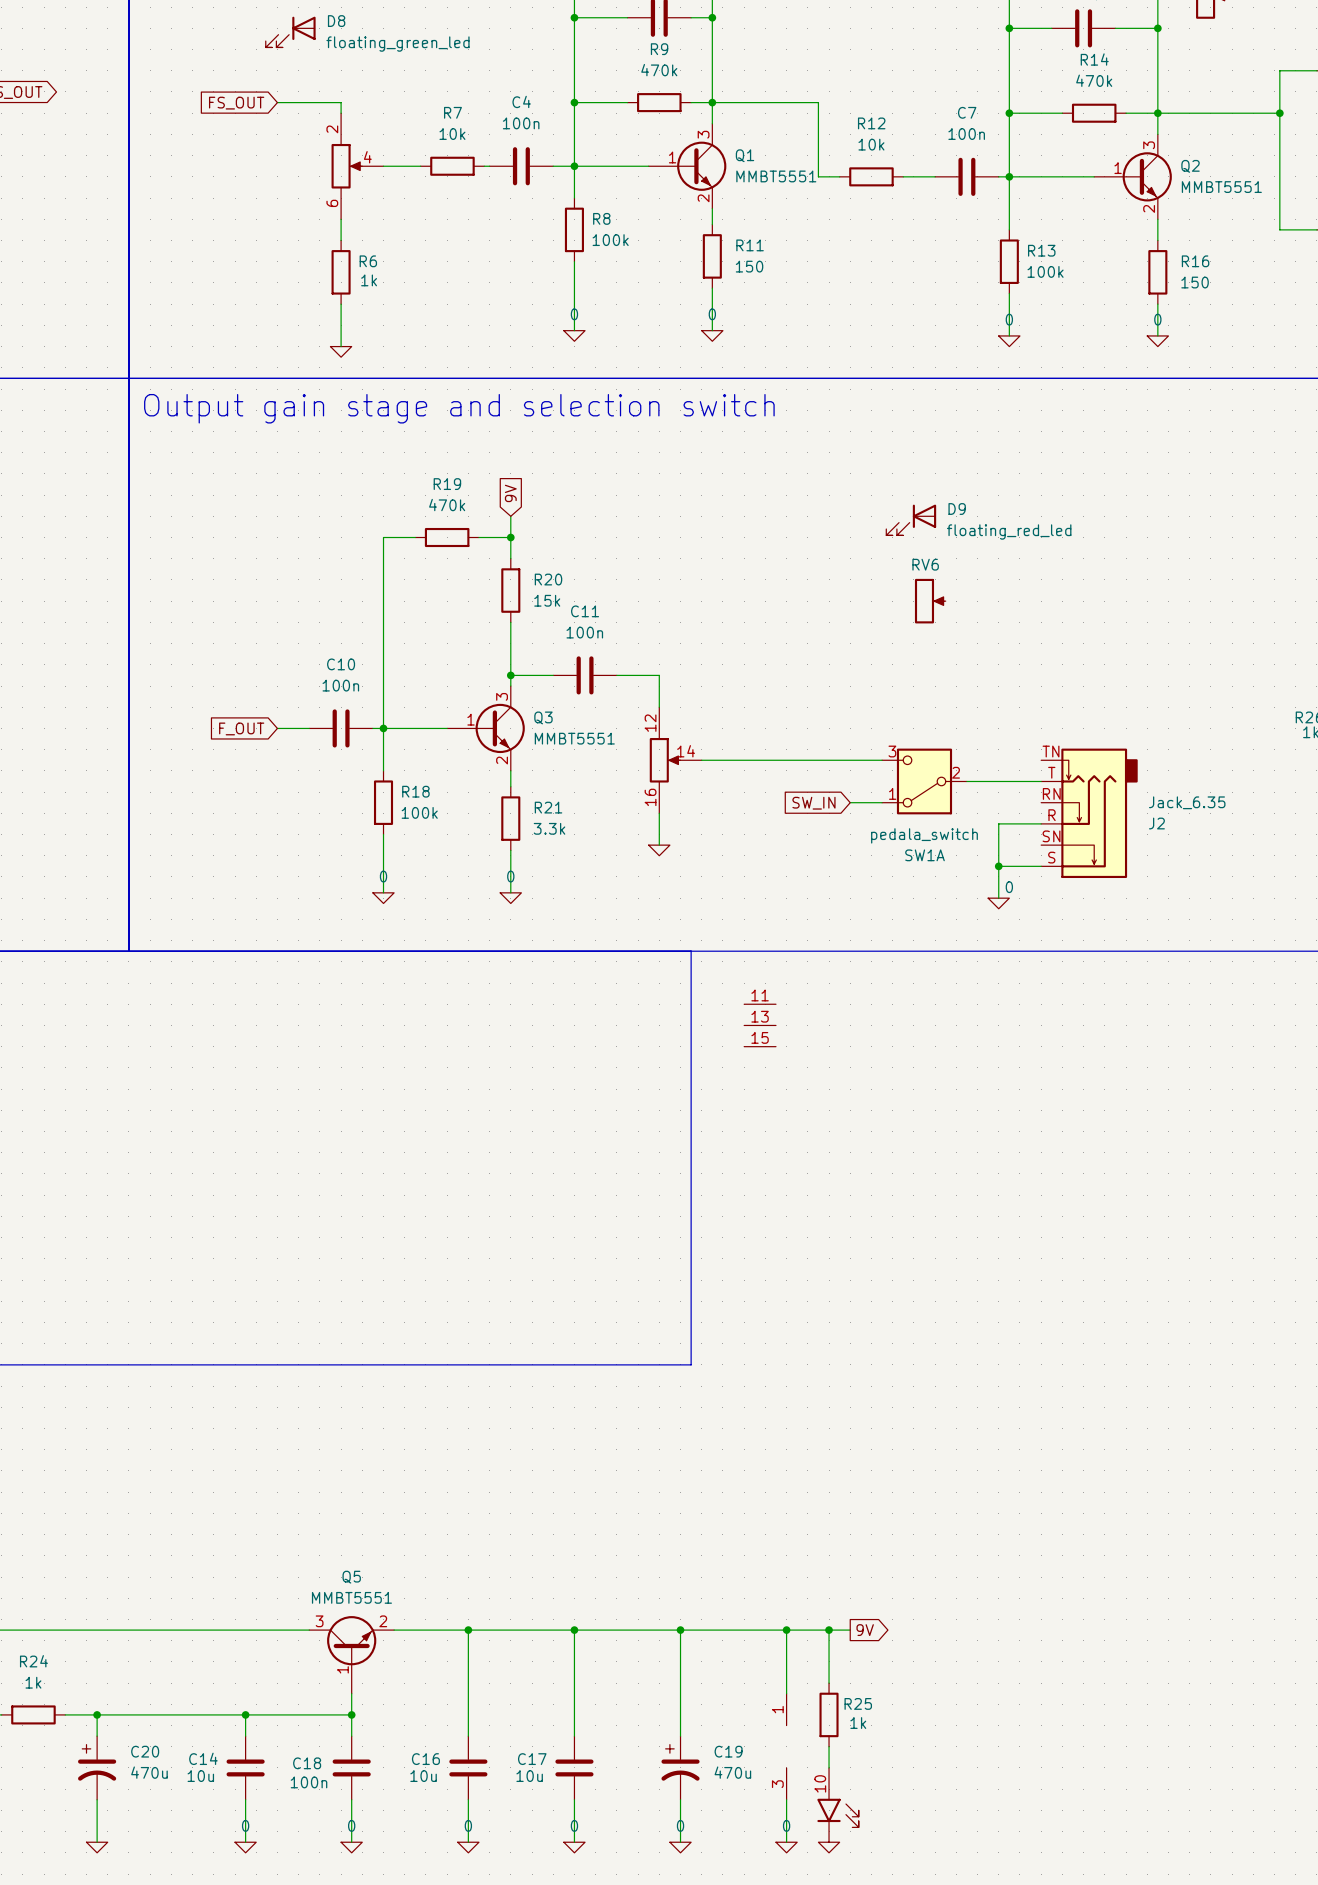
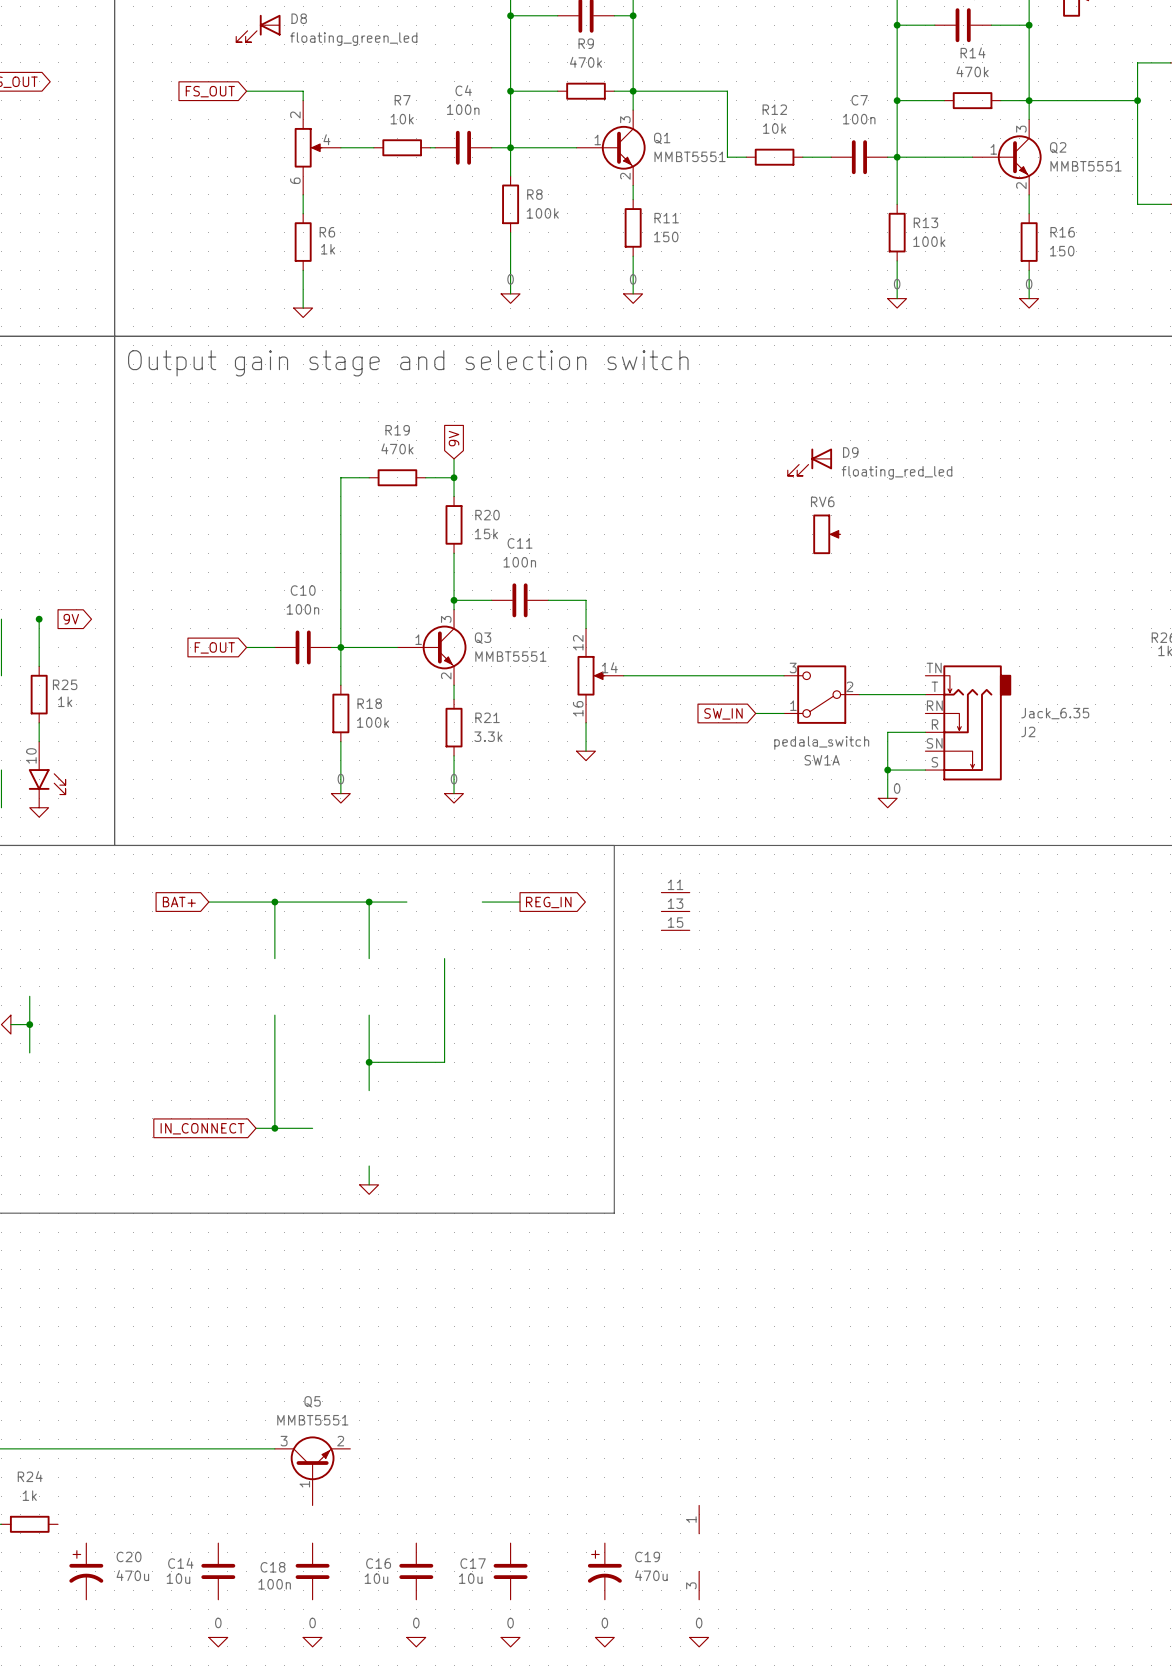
wire: none -> (1, 619) (1, 675)
wire: none -> (39, 619) (39, 666)
junction: none -> (39, 619)
global label: none -> 9V (71, 619)
wire: none -> (39, 722) (39, 741)
wire: none -> (1, 770) (1, 807)
part: none -> (47, 779)
global label: none -> BAT+ (179, 902)
wire: none -> (208, 902) (406, 902)
wire: none -> (274, 902) (274, 958)
junction: none -> (274, 902)
wire: none -> (369, 902) (369, 958)
junction: none -> (369, 902)
wire: none -> (482, 902) (520, 902)
global label: none -> REG_IN (548, 902)
wire: none -> (444, 958) (444, 1062) (369, 1062)
wire: none -> (29, 996) (29, 1052)
wire: none -> (274, 1015) (274, 1128)
wire: none -> (369, 1015) (369, 1090)
power symbol: none -> (6, 1024)
wire: none -> (10, 1024) (29, 1024)
junction: none -> (29, 1024)
junction: none -> (369, 1062)
global label: none -> IN_CONNECT (202, 1128)
wire: none -> (256, 1128) (312, 1128)
junction: none -> (274, 1128)
wire: none -> (369, 1166) (369, 1184)
power symbol: none -> (369, 1189)
wire: (394, 1630) (850, 1630) -> none
wire: (468, 1630) (468, 1736) -> none
junction: (468, 1630) -> none
wire: (574, 1630) (574, 1736) -> none
junction: (574, 1630) -> none
wire: (680, 1630) (680, 1736) -> none
junction: (680, 1630) -> none
wire: (786, 1630) (786, 1693) -> none
junction: (786, 1630) -> none
wire: (829, 1630) (829, 1683) -> none
junction: (829, 1630) -> none
global label: 9V (865, 1630) -> none
wire: (351, 1693) (351, 1736) -> none
wire: (65, 1714) (351, 1714) -> none
wire: (97, 1714) (97, 1736) -> none
junction: (97, 1714) -> none
wire: (245, 1714) (245, 1736) -> none
junction: (245, 1714) -> none
junction: (351, 1714) -> none
R25 position: (829, 1714) -> (39, 694)
wire: (829, 1746) (829, 1767) -> none
wire: (97, 1799) (97, 1842) -> none
wire: (245, 1799) (245, 1842) -> none
wire: (351, 1799) (351, 1842) -> none
wire: (468, 1799) (468, 1842) -> none
wire: (574, 1799) (574, 1842) -> none
wire: (680, 1799) (680, 1842) -> none
wire: (786, 1799) (786, 1842) -> none
part: (838, 1810) -> none
power symbol: (97, 1847) -> none

